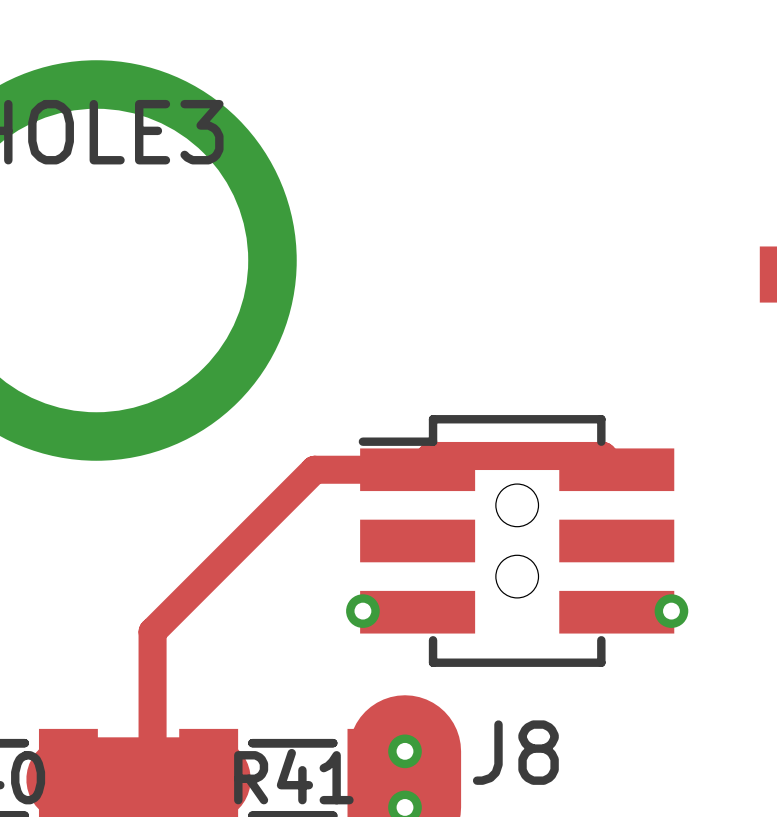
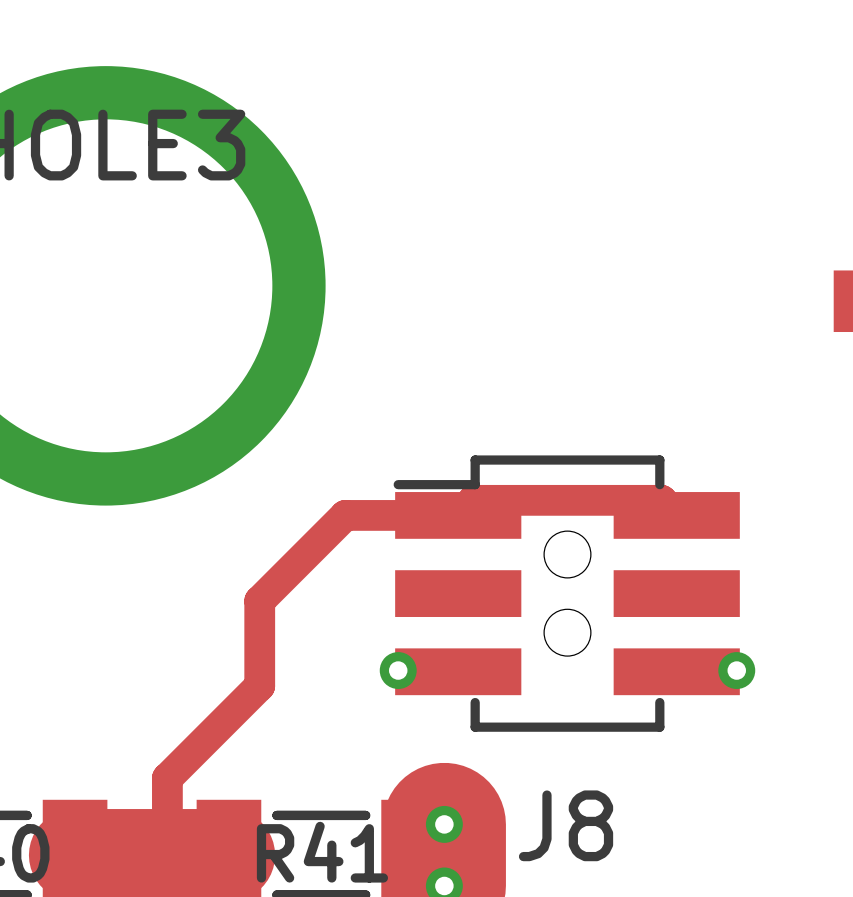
top track: (236, 547) (152, 631) (152, 709) -> (259, 600) (259, 685) (167, 778)

